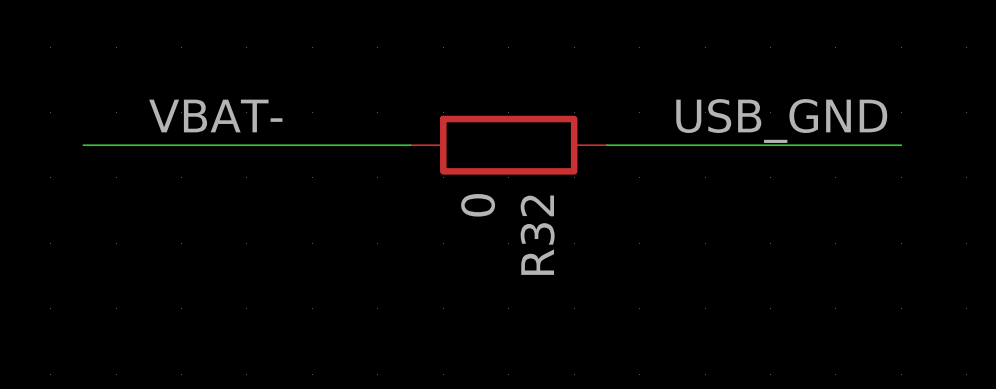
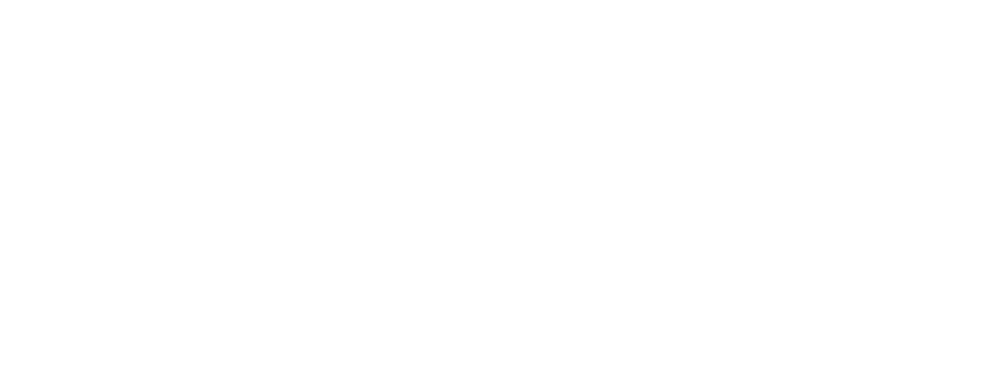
label: VBAT- (215, 116) -> none
label: USB_GND (781, 120) -> none
wire: (83, 145) (410, 145) -> none
R32: 0 (508, 145) -> none
wire: (606, 145) (901, 145) -> none

